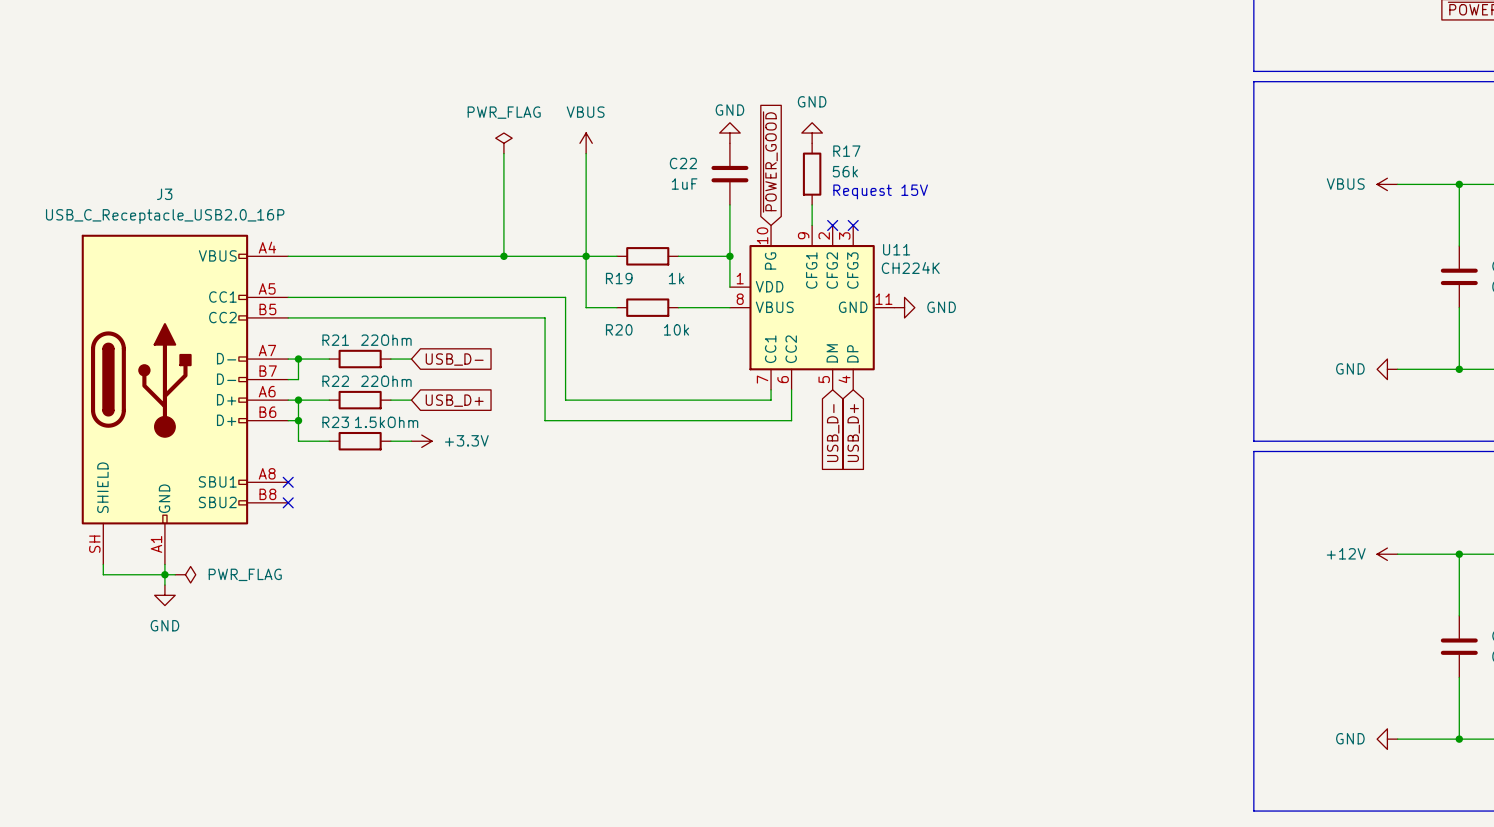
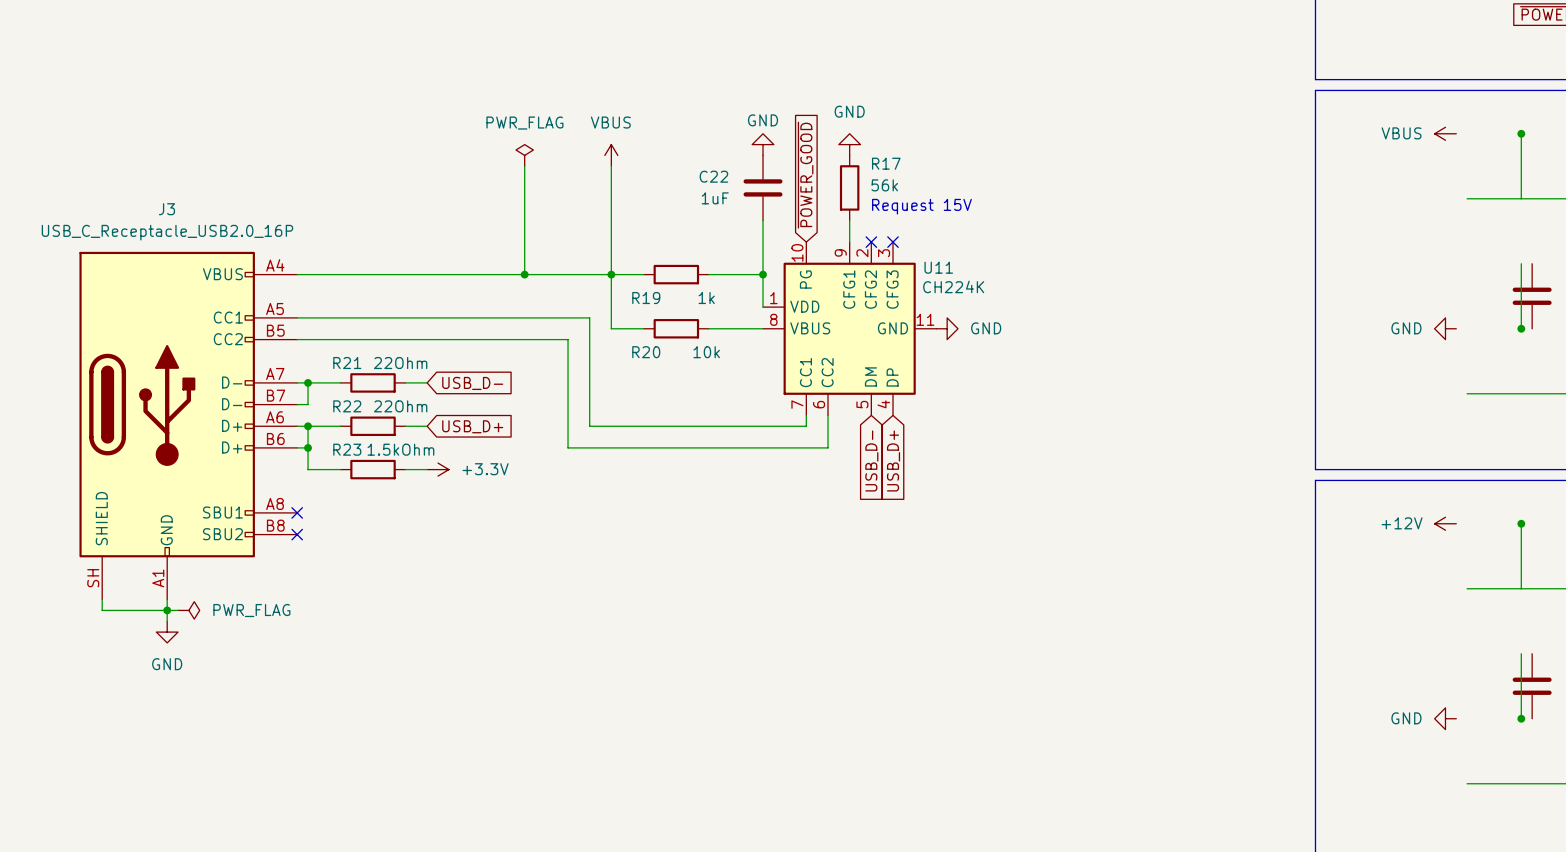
junction: none -> (1521, 133)
power symbol position: VBUS (1387, 184) -> VBUS (1445, 133)
wire: (1459, 184) (1459, 246) -> (1521, 133) (1521, 198)
junction: (1459, 184) -> none
junction: none -> (1521, 328)
wire: (1459, 307) (1459, 369) -> (1521, 263) (1521, 328)
power symbol position: GND (1387, 369) -> GND (1445, 328)
junction: (1459, 369) -> none
junction: none -> (1521, 523)
power symbol position: +12V (1387, 554) -> +12V (1445, 523)
wire: (1459, 554) (1459, 615) -> (1521, 523) (1521, 588)
junction: (1459, 554) -> none
junction: none -> (1521, 718)
wire: (1459, 677) (1459, 739) -> (1521, 653) (1521, 718)
power symbol position: GND (1387, 739) -> GND (1445, 718)
junction: (1459, 739) -> none

